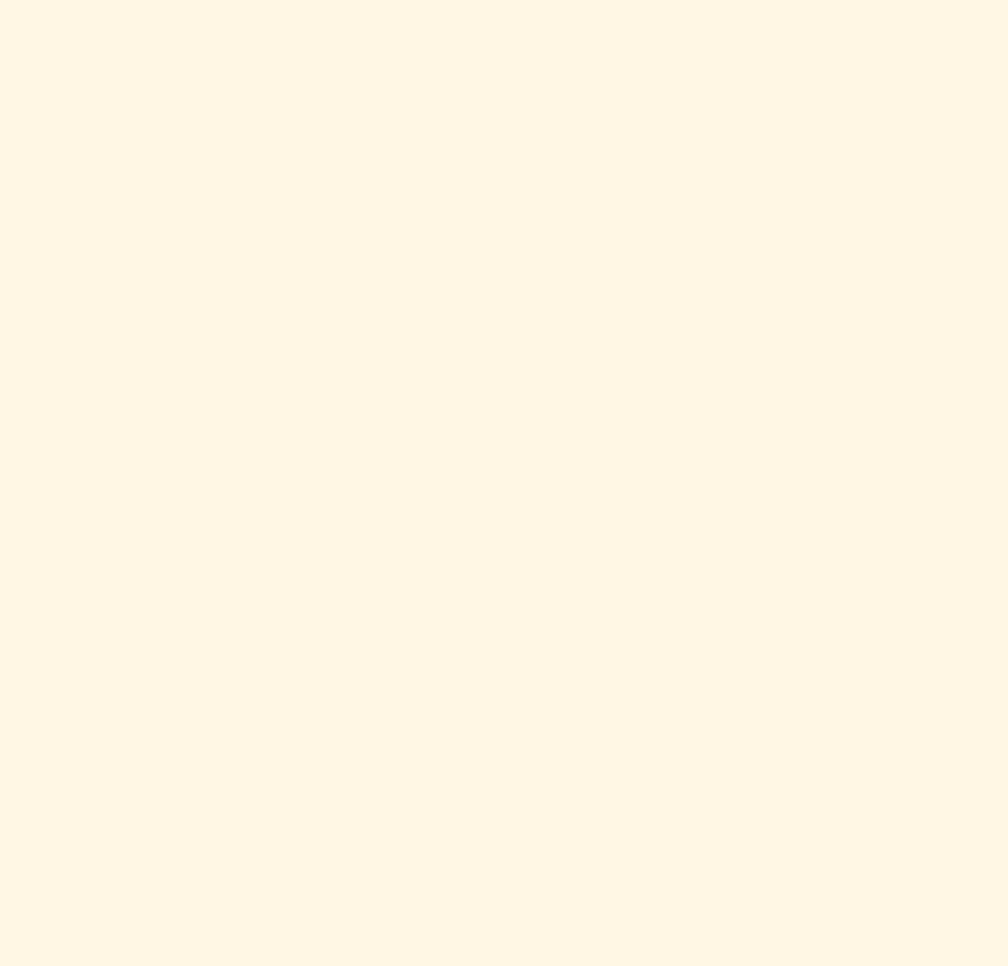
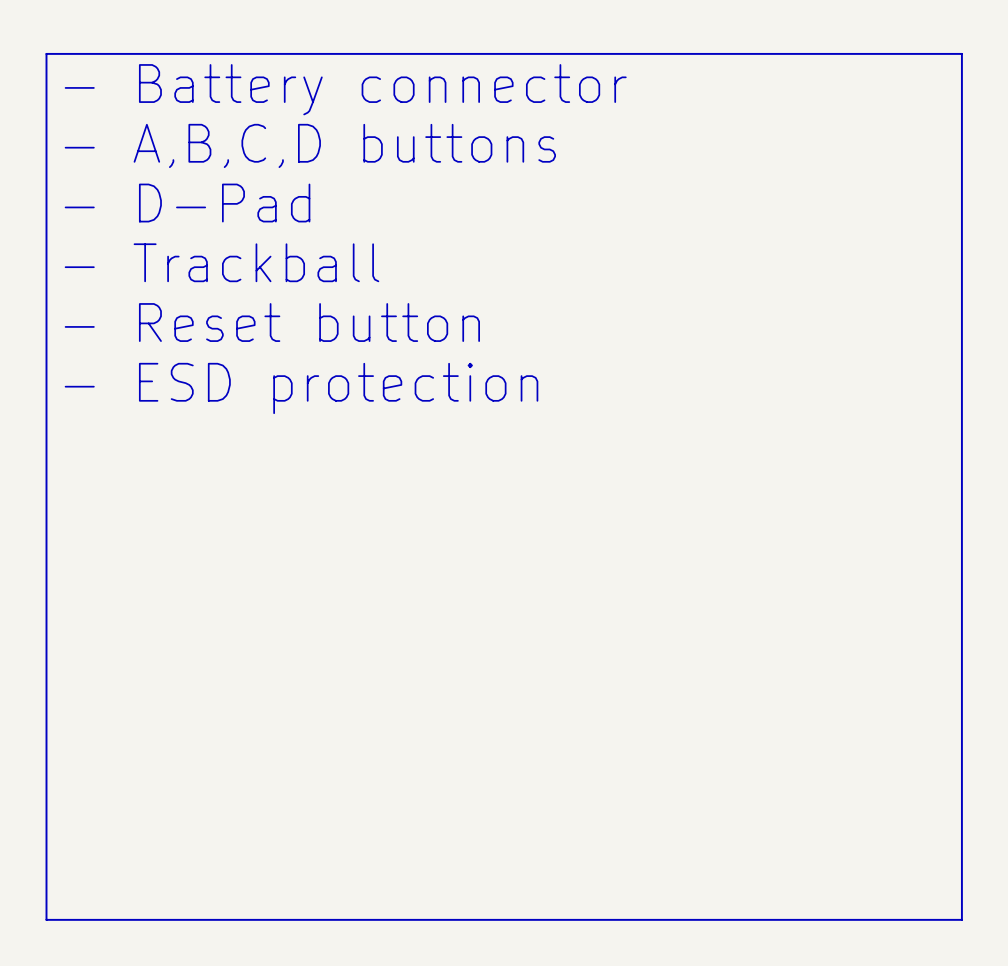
line: none -> (46, 53) (961, 53) (961, 919) (46, 919) (46, 53)
text: none -> - Battery connector (345, 89)
text: none -> - A,B,C,D buttons (310, 145)
text: none -> - D-Pad (187, 203)
text: none -> - Trackball (221, 262)
text: none -> - Reset button (272, 322)
text: none -> - ESD protection (301, 388)

